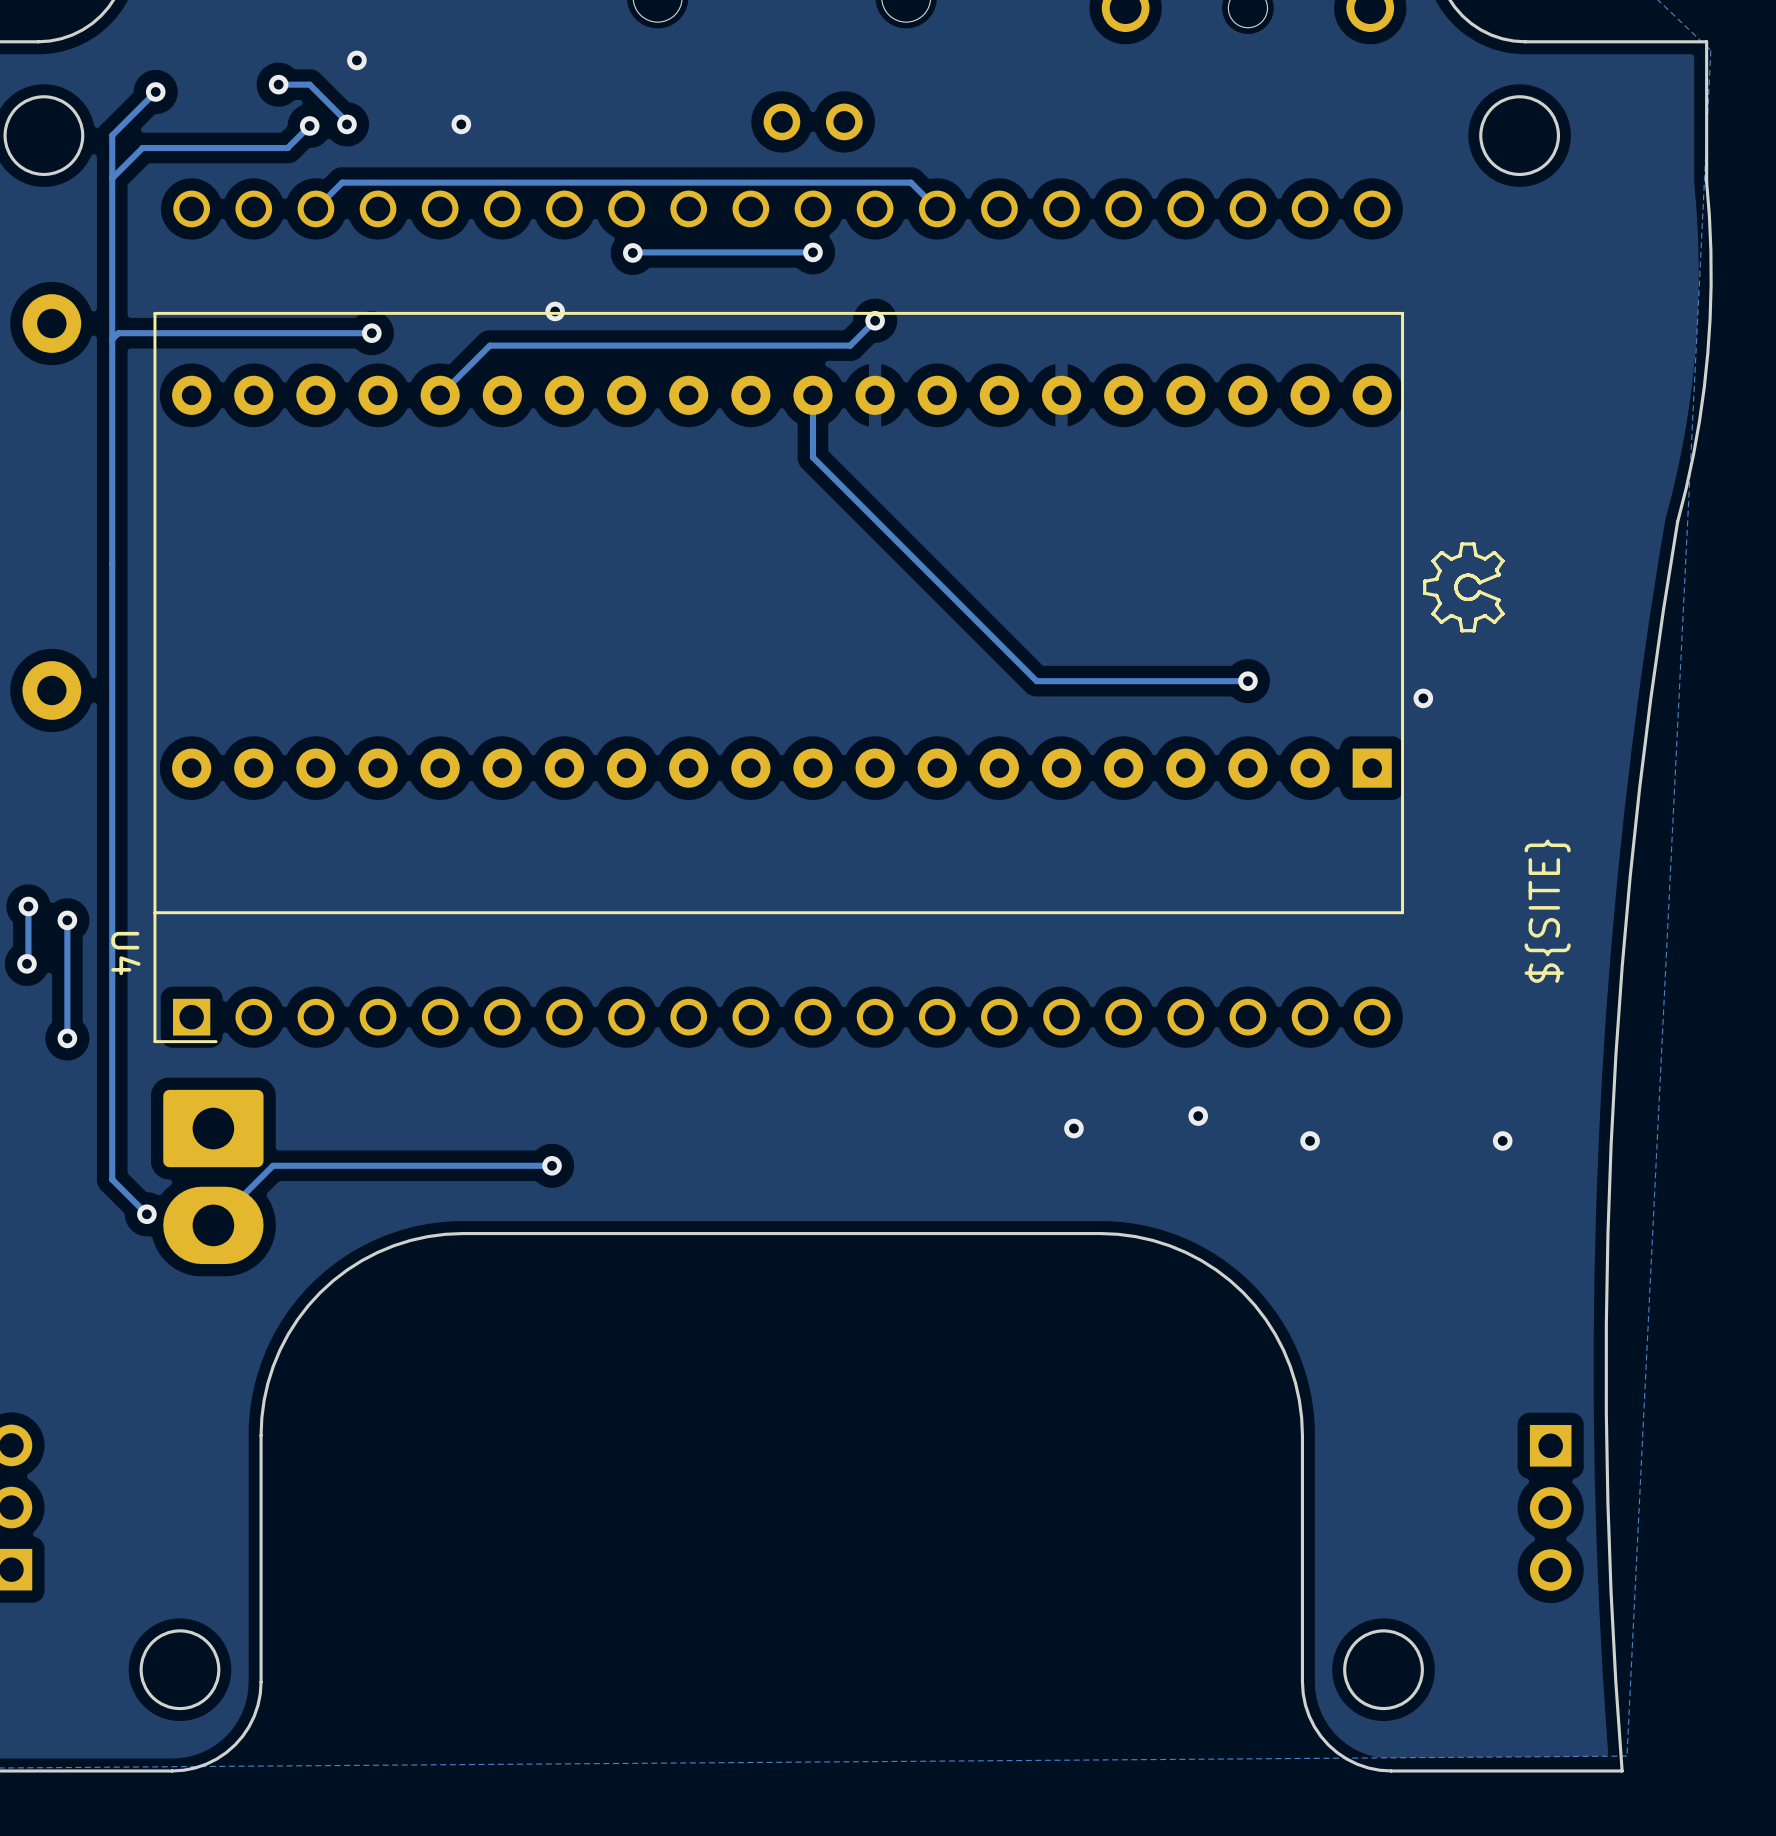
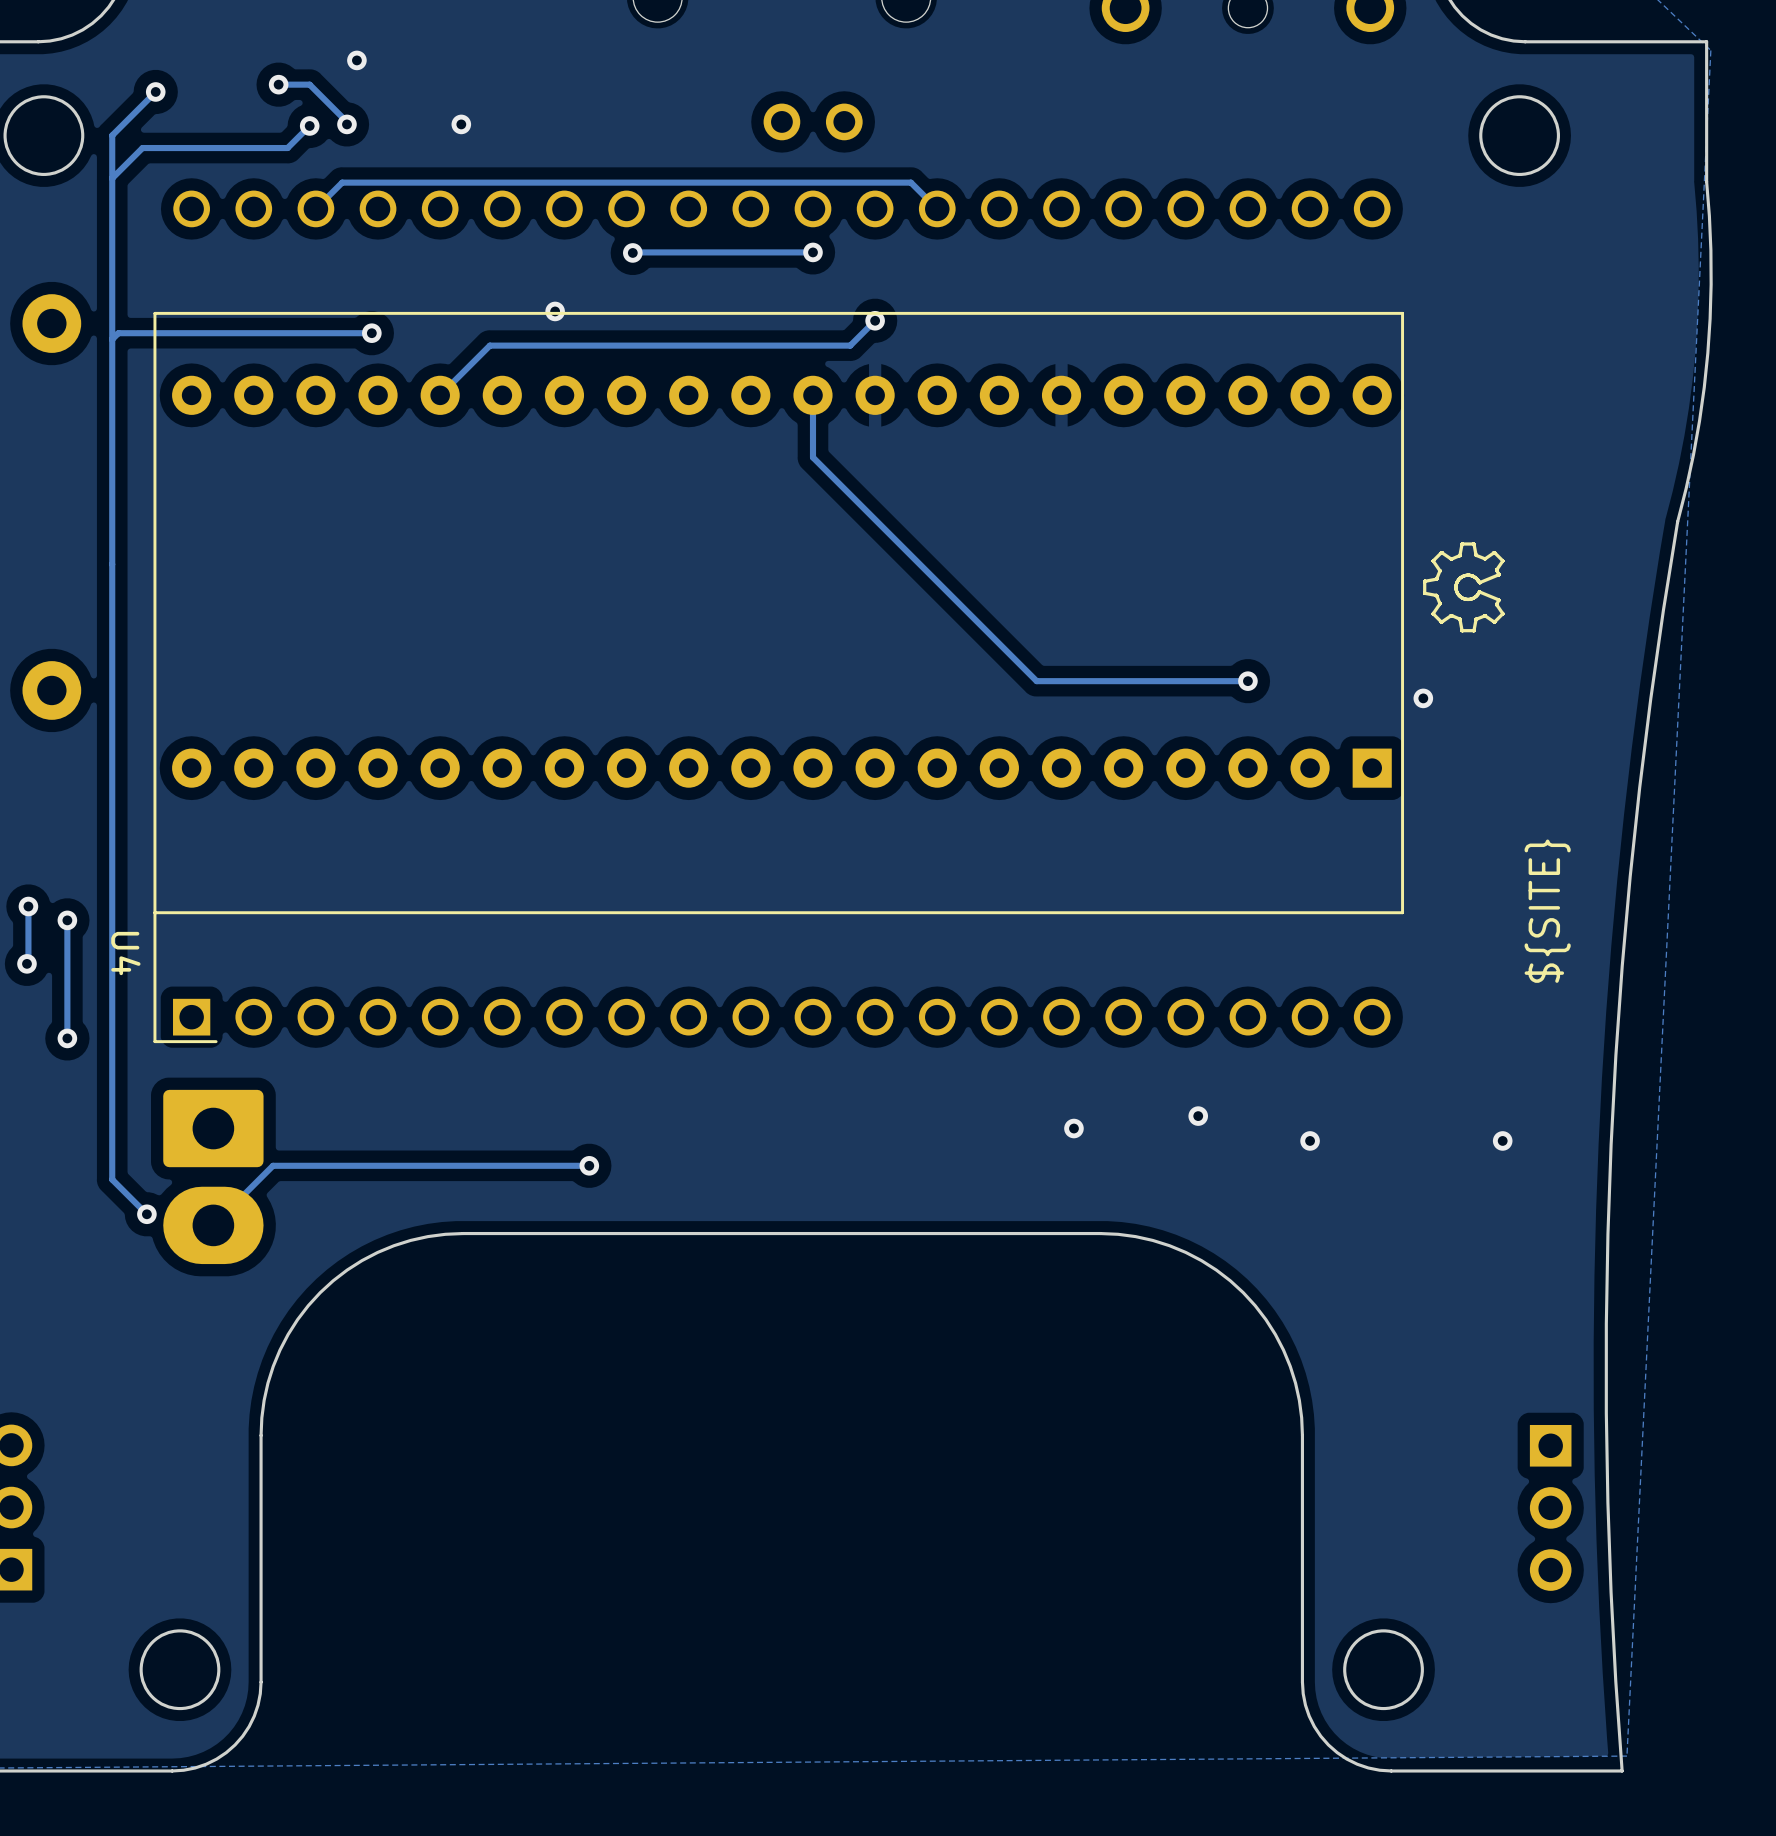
via position: (552, 1165) -> (589, 1165)
track: none -> (589, 1165) (552, 1165)

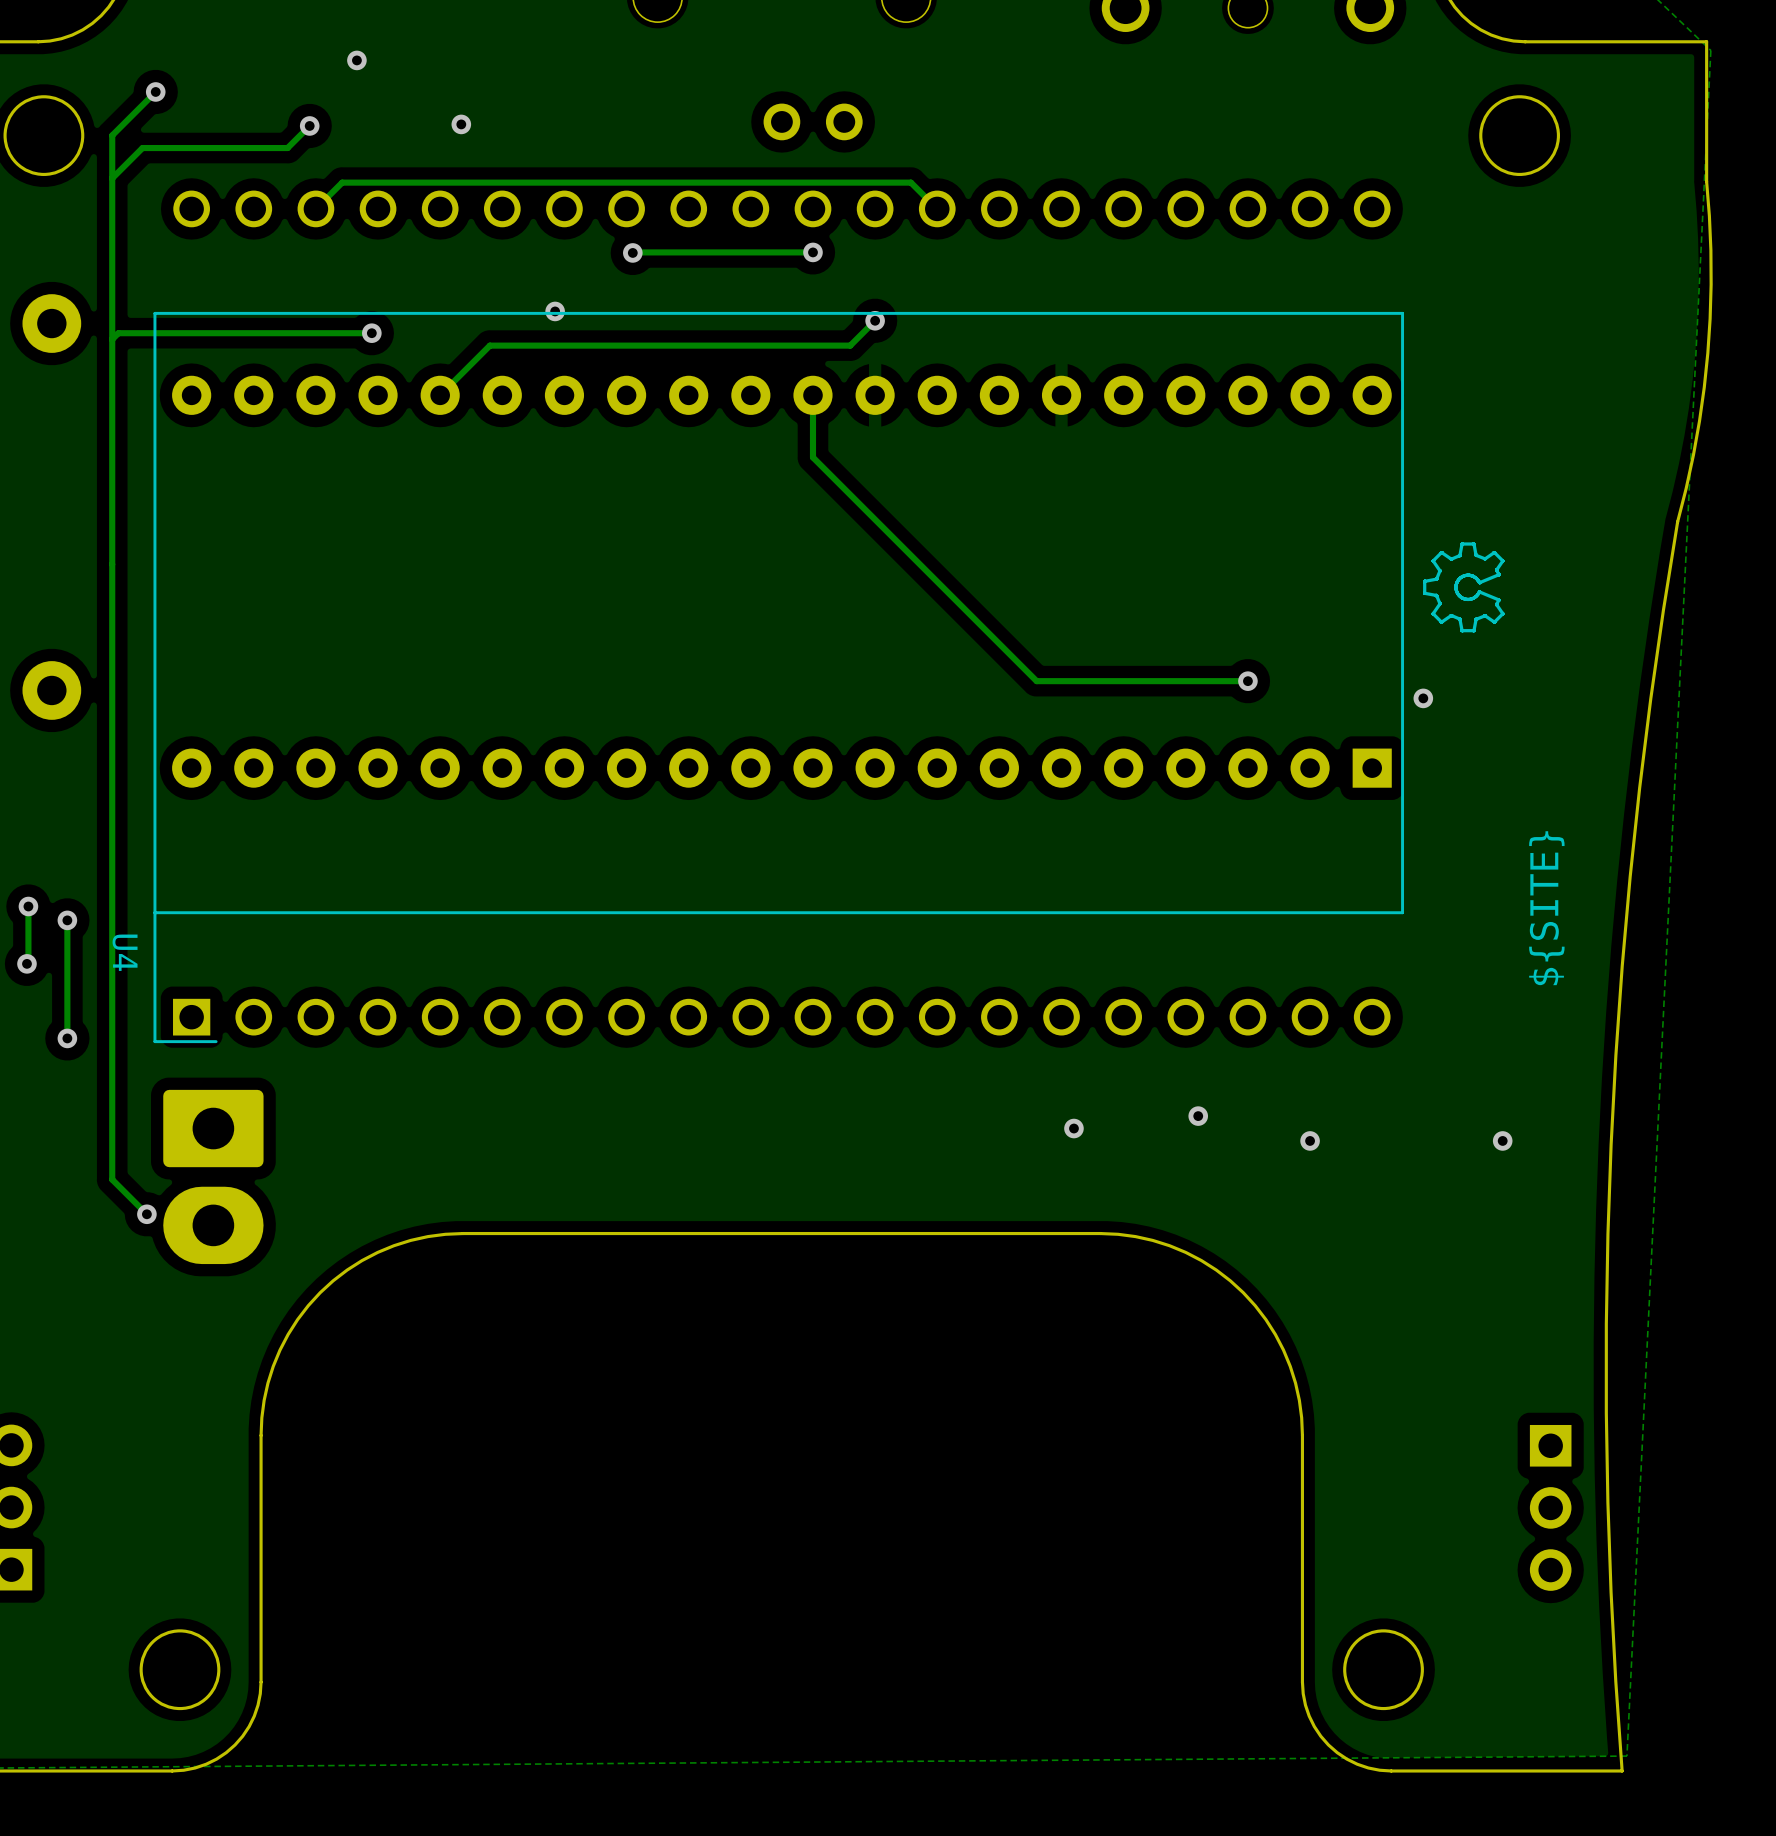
track: (278, 84) (309, 84) (346, 121) (346, 124) -> none
via: (278, 84) -> none
via: (346, 124) -> none
track: (589, 1165) (272, 1165) (213, 1225) -> none
via: (589, 1165) -> none

